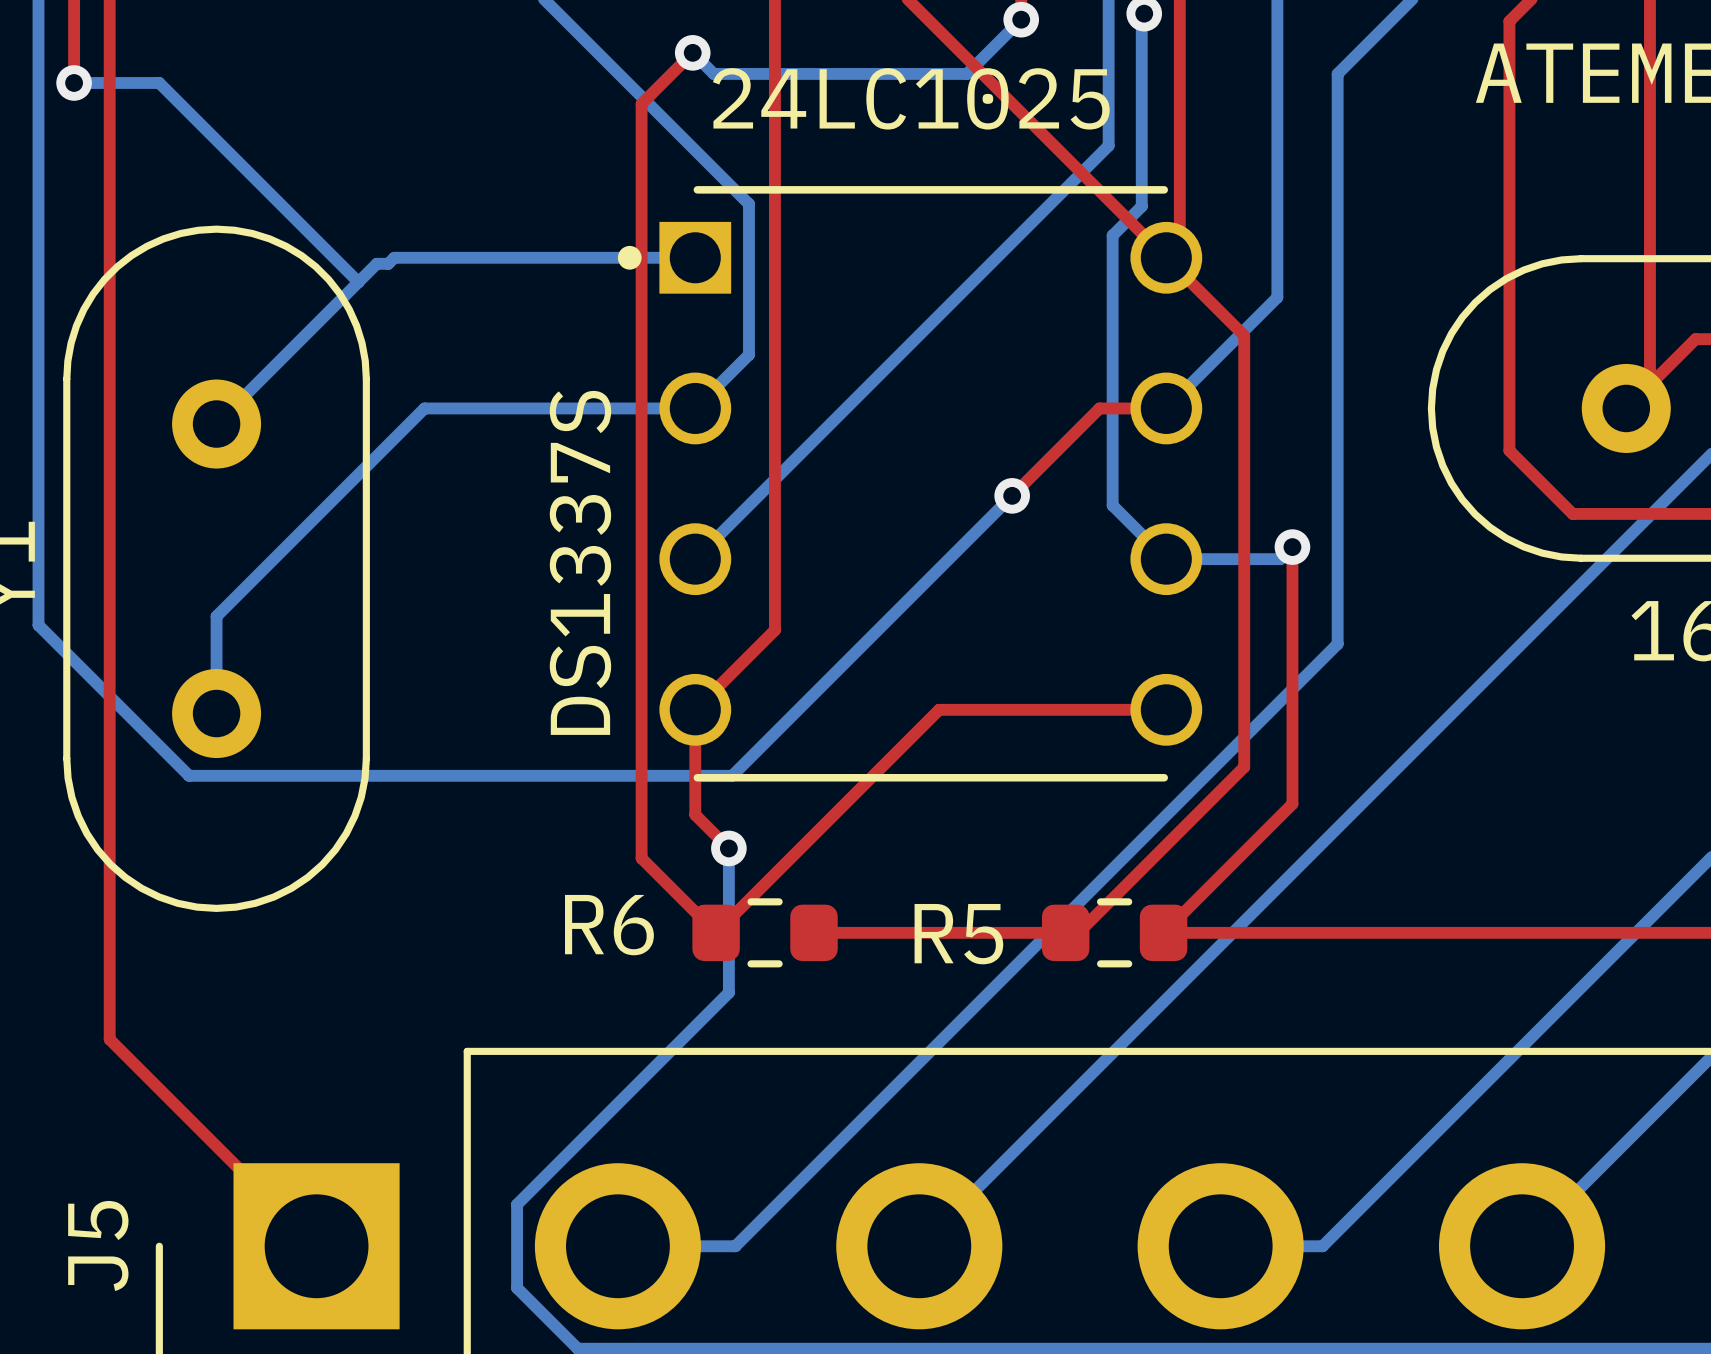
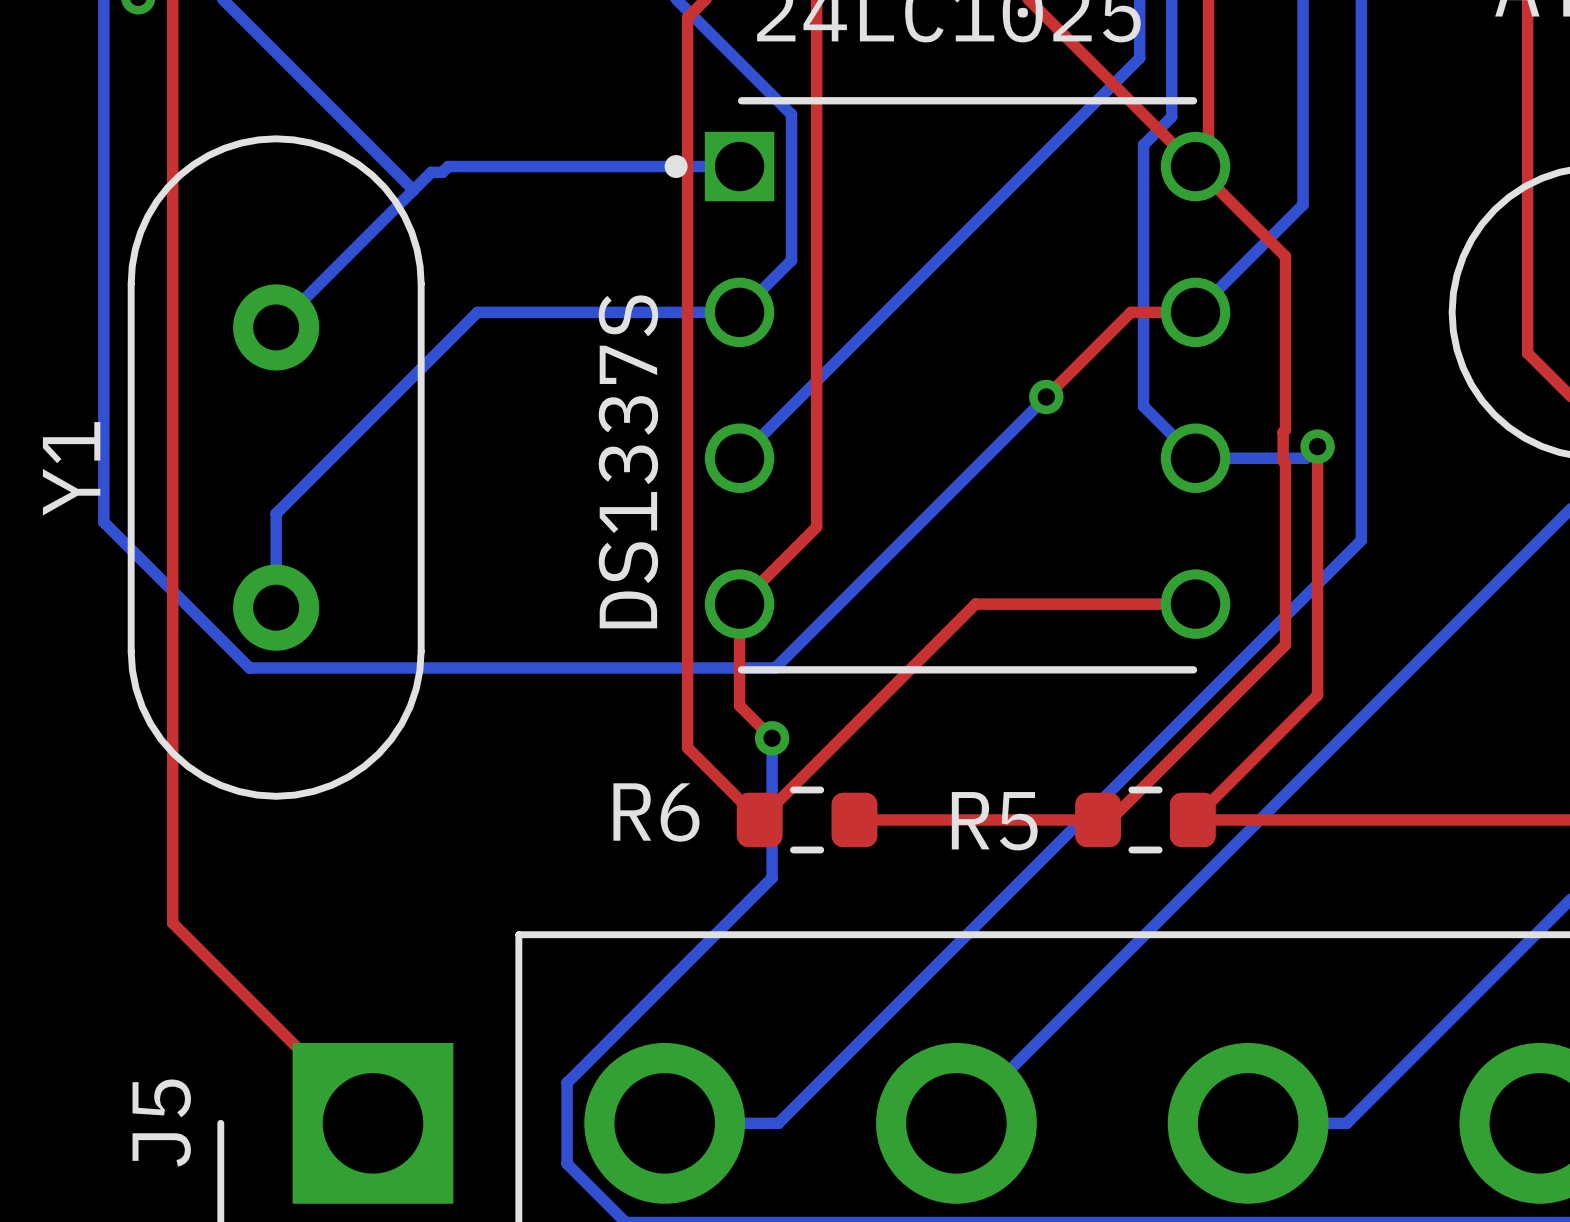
top track: (1244, 335) (1244, 767) -> (1270, 241) (1285, 256) (1285, 429) (1283, 432) (1283, 460) (1285, 463) (1285, 644) (1270, 659)

